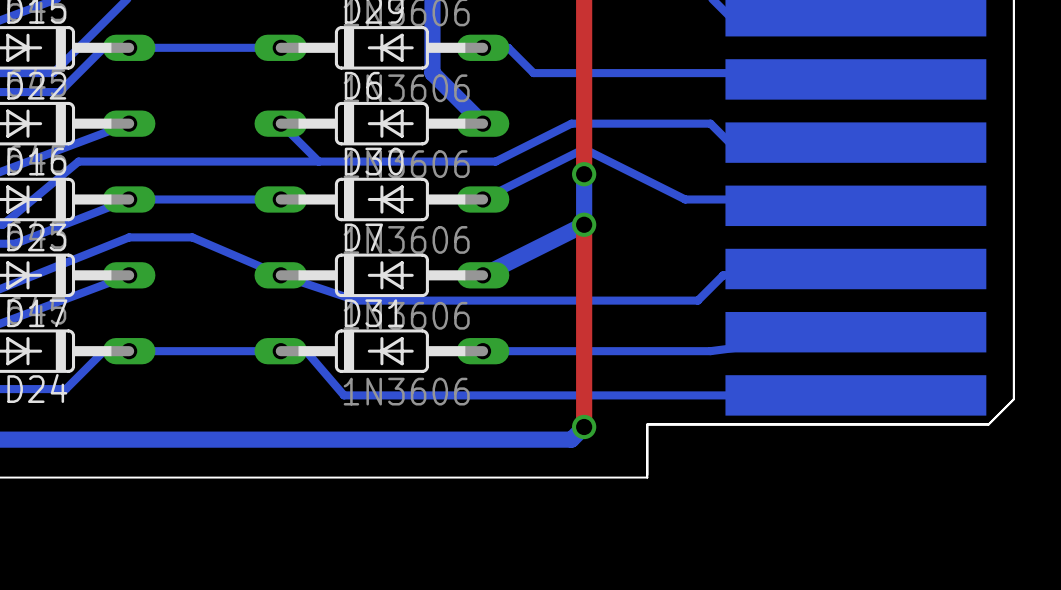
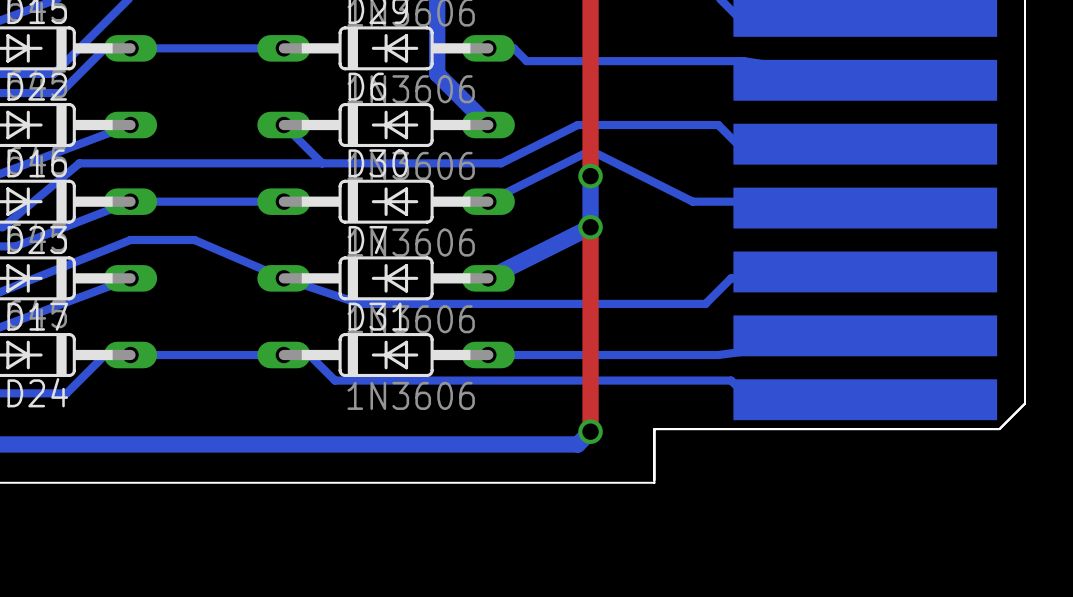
bottom track: (520, 60) (533, 73) (735, 73) (855, 79) -> (526, 61) (743, 61) (865, 80)
bottom track: (306, 351) (344, 395) (855, 395) -> (309, 355) (334, 380) (731, 380) (743, 393) (865, 399)

